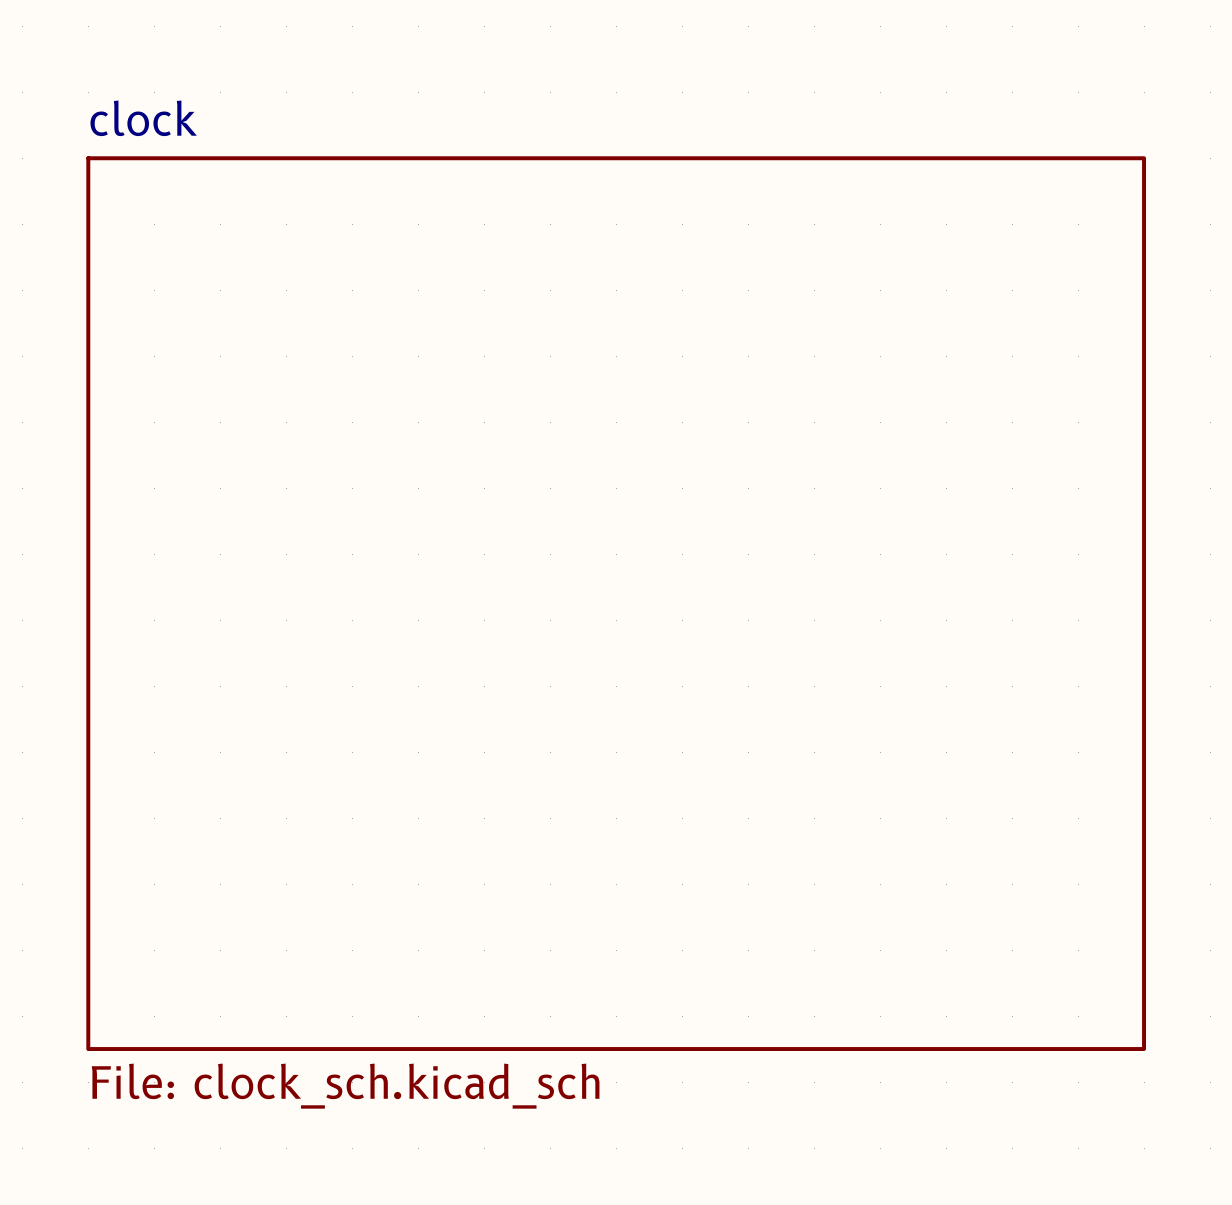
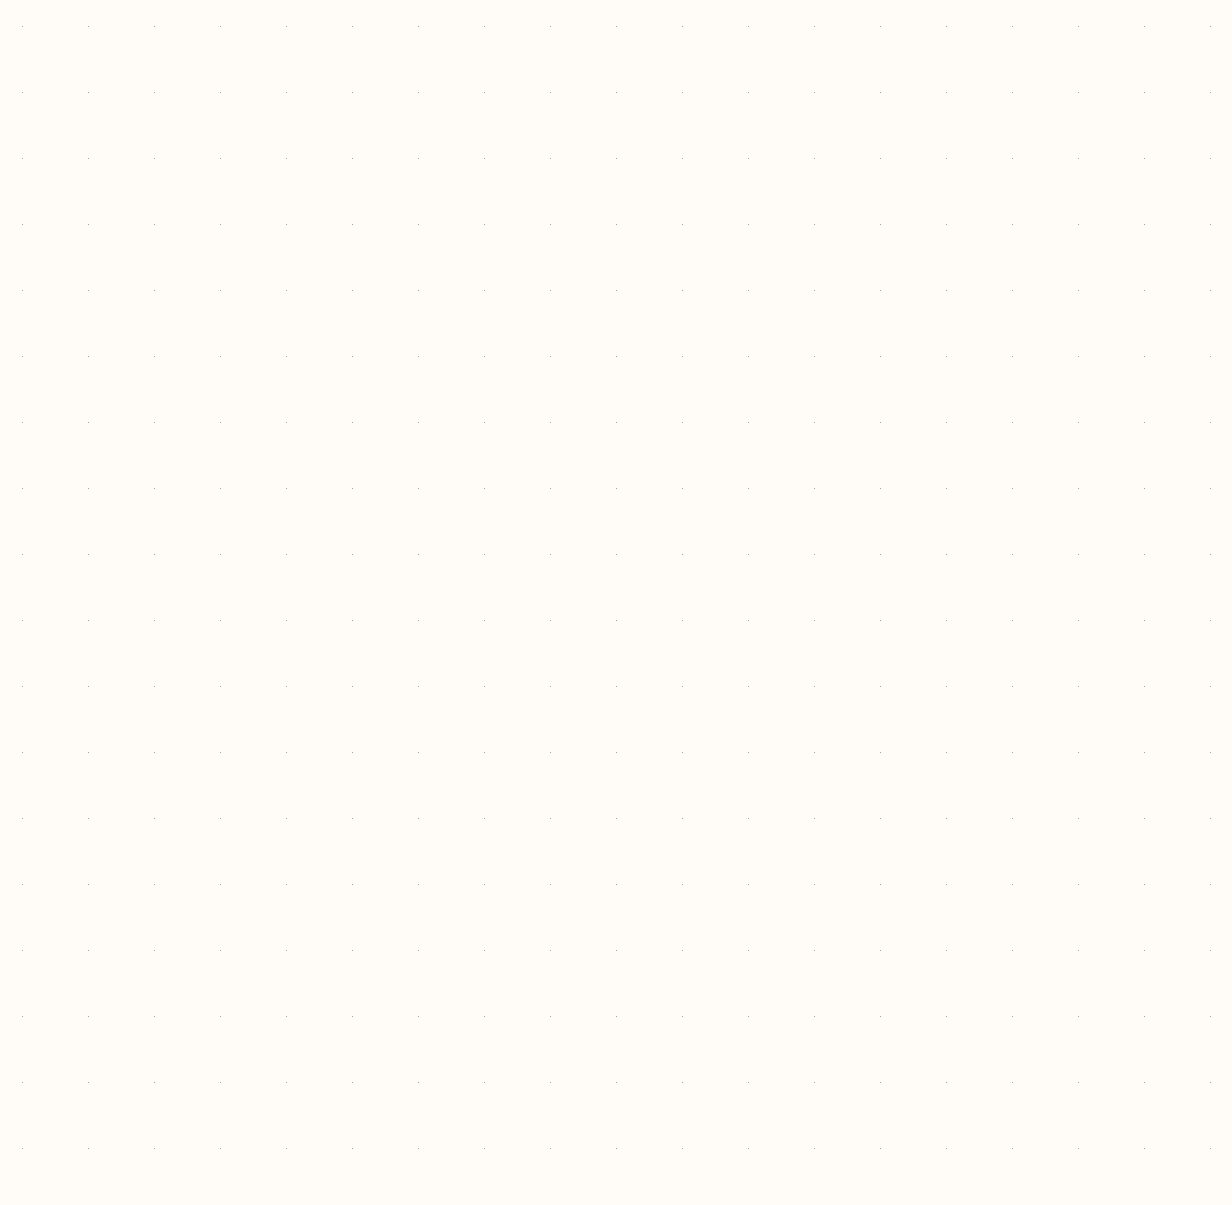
sheet clock: File: clock_sch.kicad_sch (616, 603) -> none

